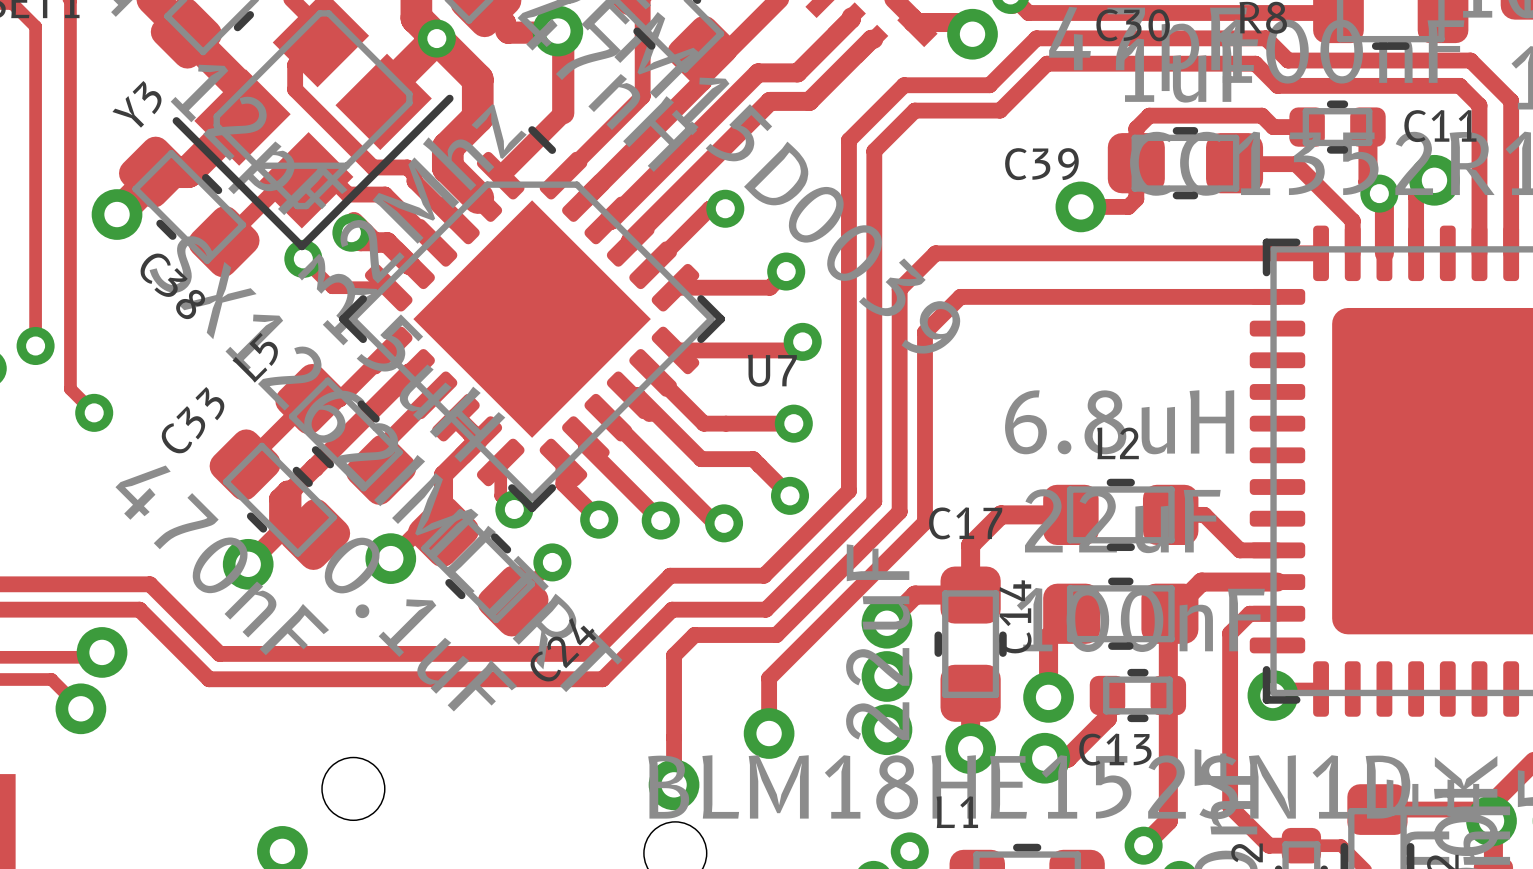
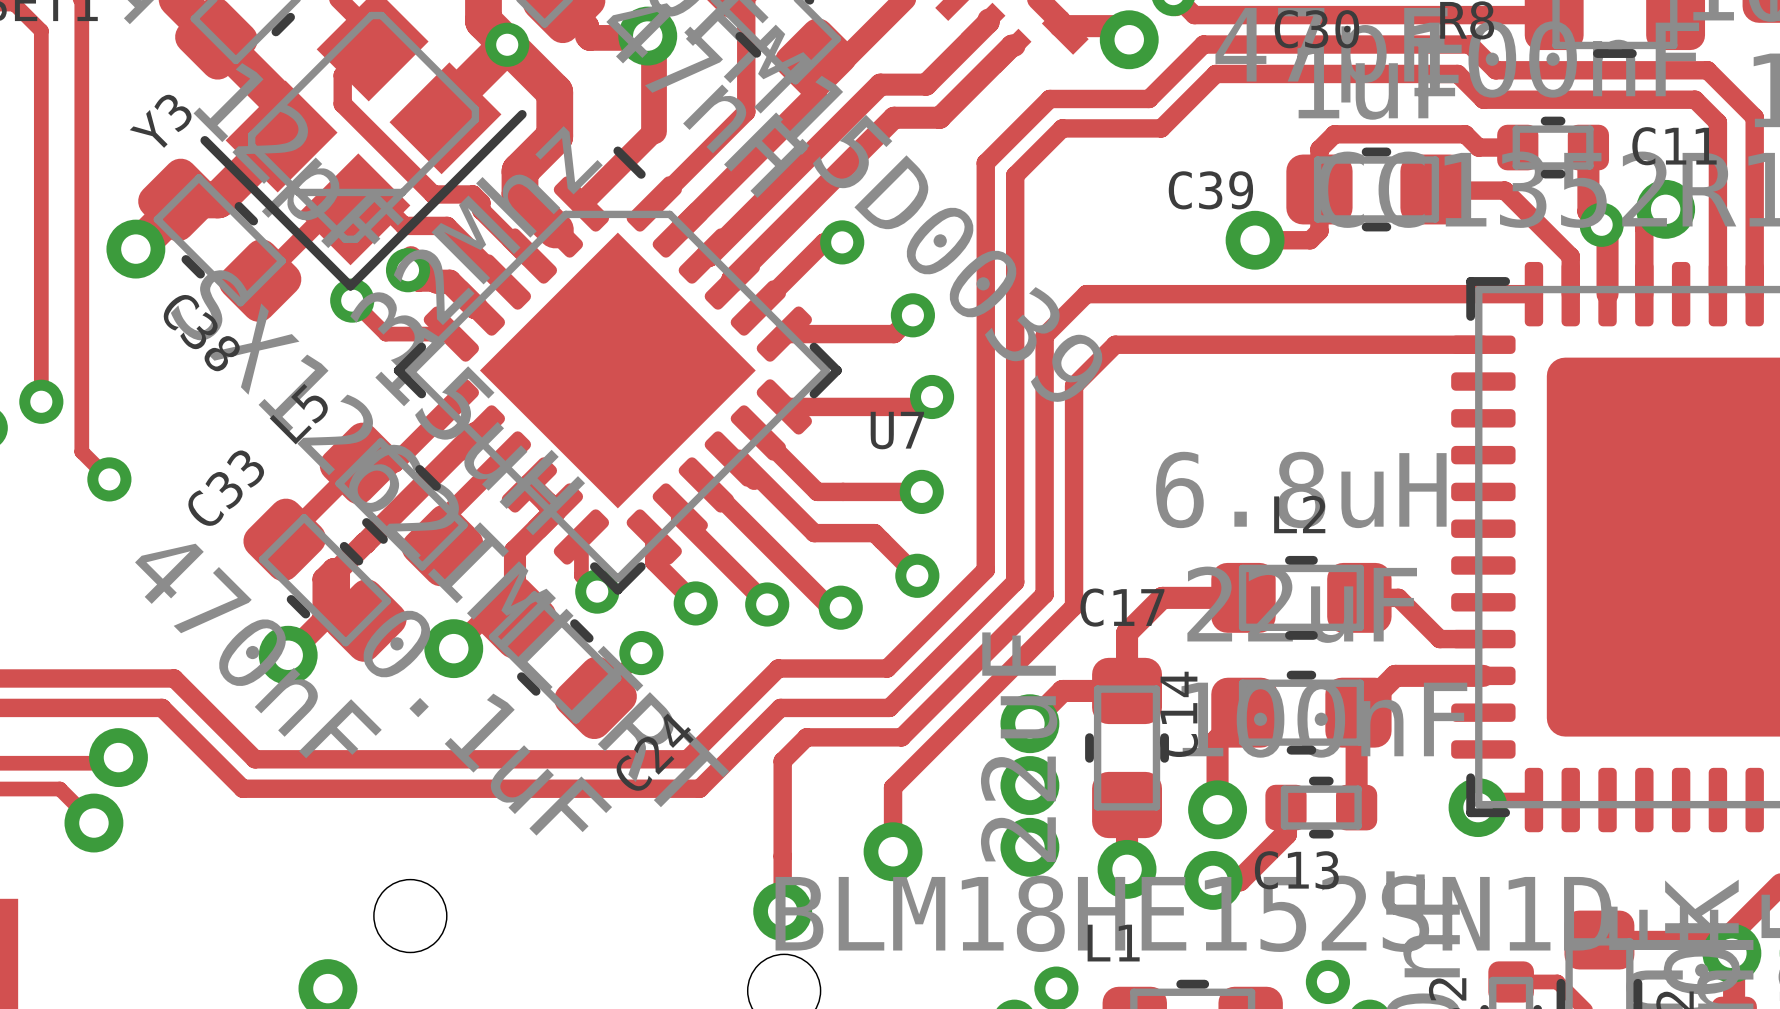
track: (1277, 613) (1249, 613) (1230, 633) (1230, 806) (1269, 845) (1301, 845) -> none
track: (1168, 695) (1168, 820) (1143, 845) -> none

